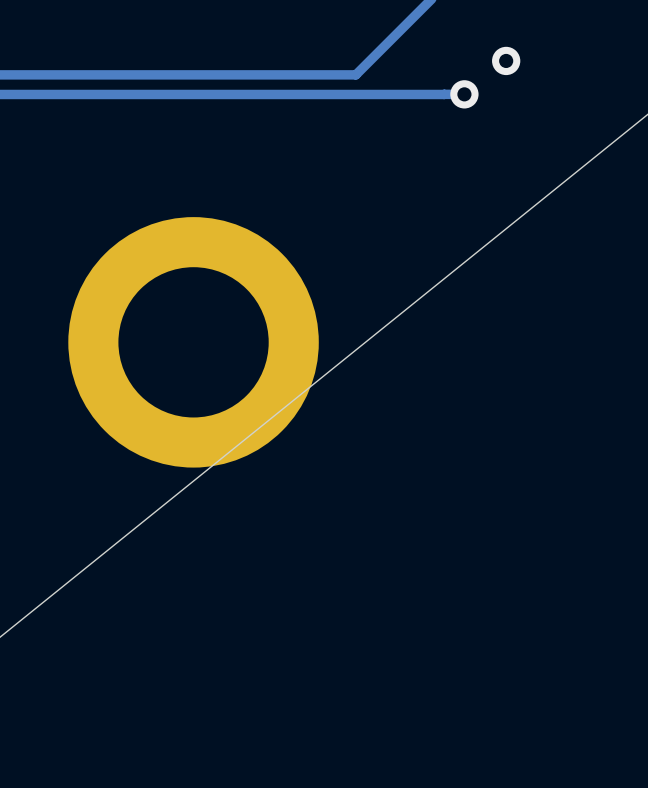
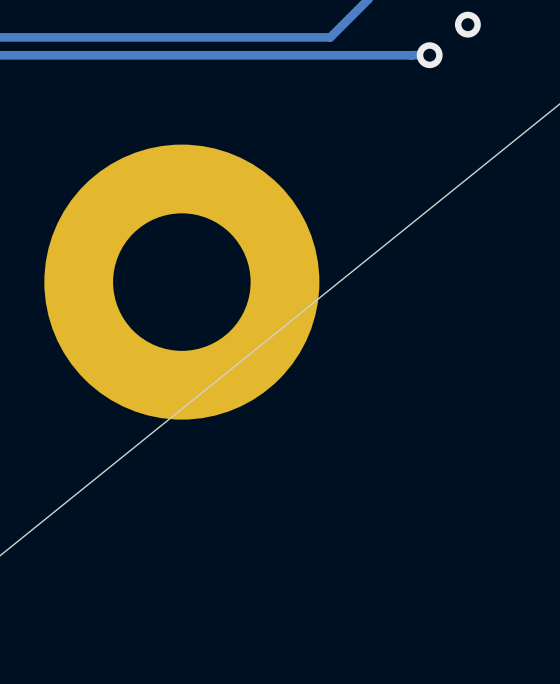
part footprint: [68, 217, 319, 468] -> [44, 144, 320, 420]

